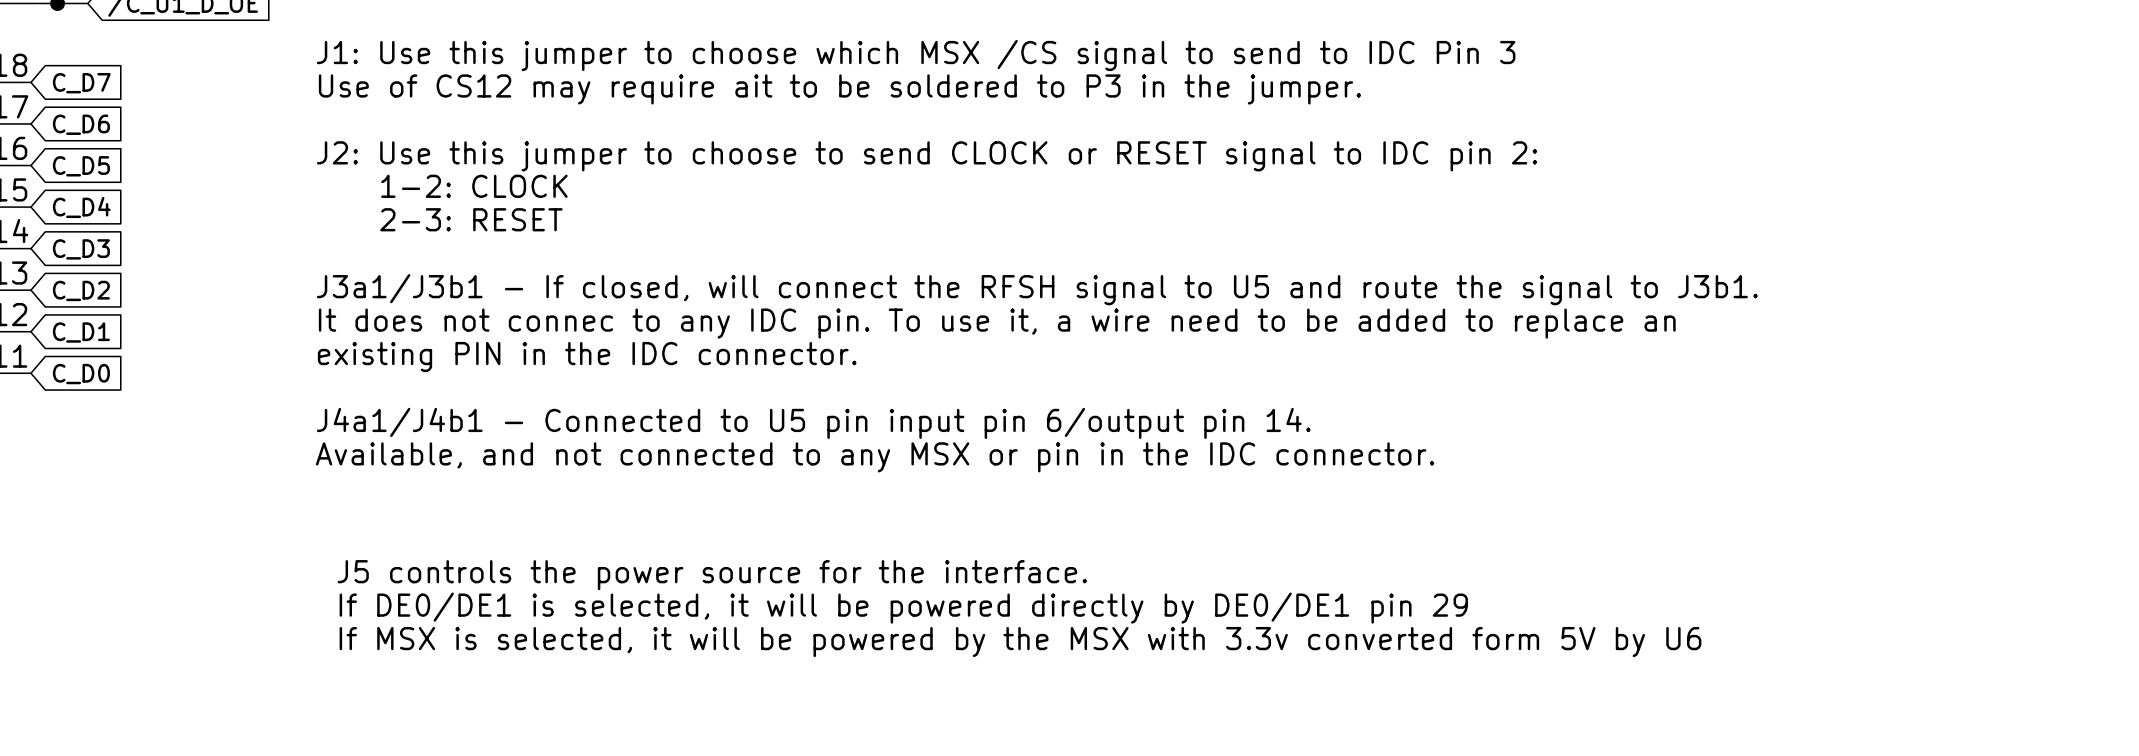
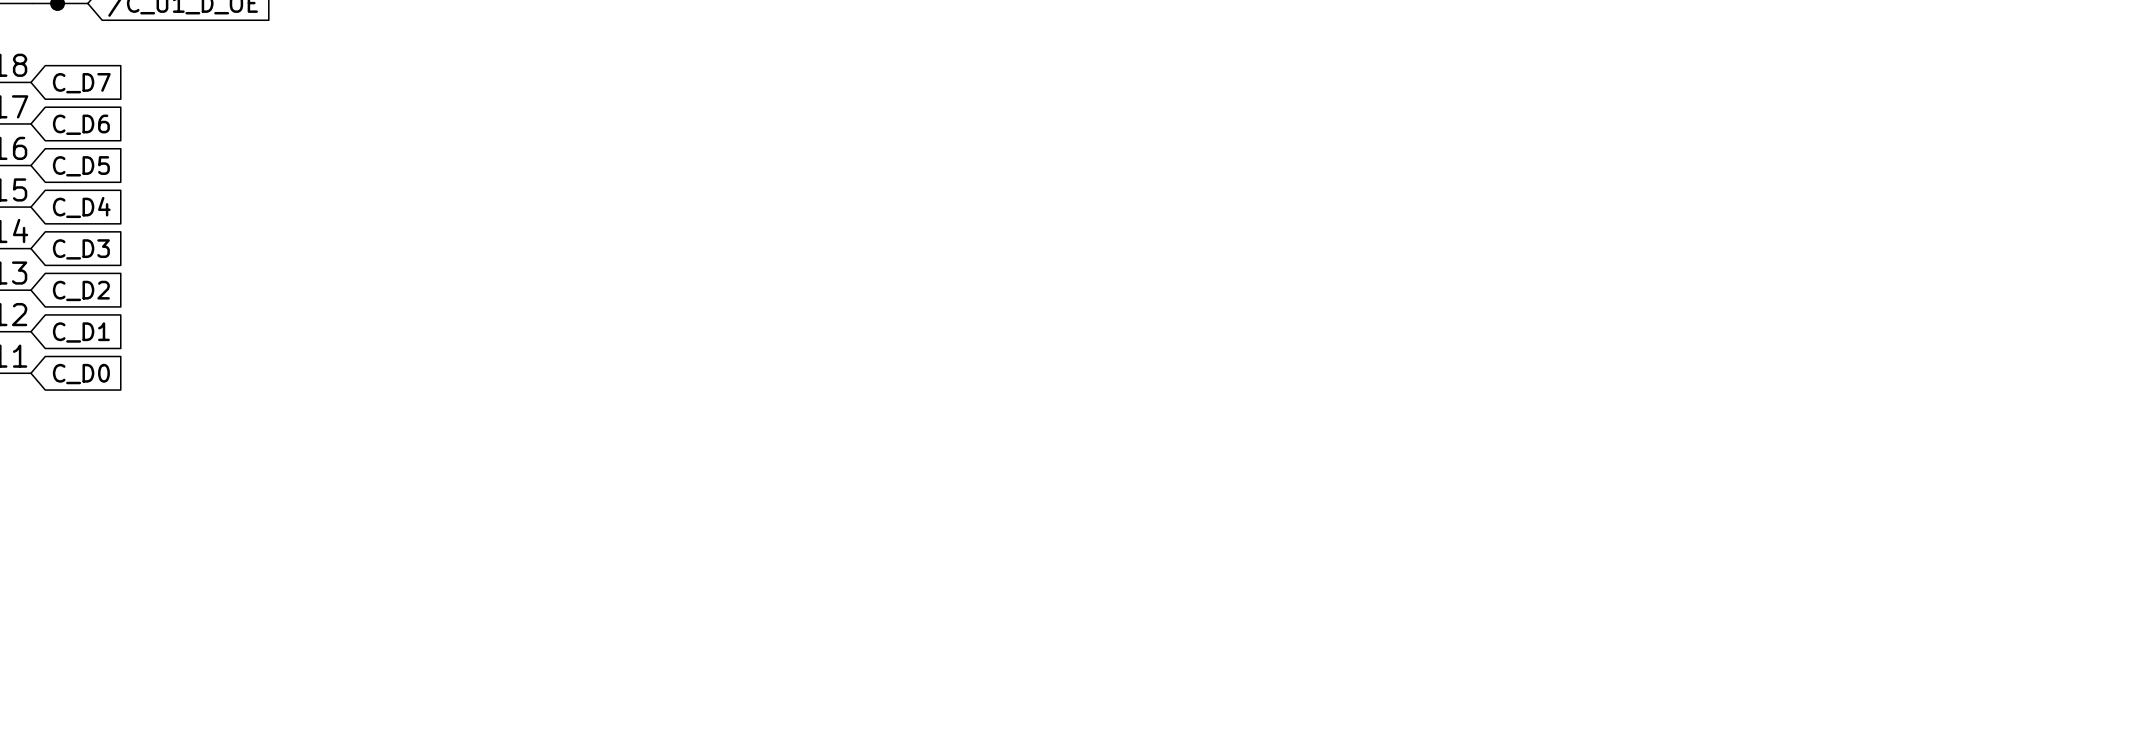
text: J1: Use this jumper to choose which MSX /CS signal to send to IDC Pin 3 (916, 55) -> none
text: Use of CS12 may require ait to be soldered to P3 in the jumper. (839, 89) -> none
text: J2: Use this jumper to choose to send CLOCK or RESET signal to IDC pin 2: (927, 156) -> none
text: 1-2: CLOCK (474, 186) -> none
text: 2-3: RESET (471, 219) -> none
text: J3a1/J3b1 - If closed, will connect the RFSH signal to U5 and route the signal to J3b1. (1037, 289) -> none
text: It does not connec to any IDC pin. To use it, a wire need to be added to replace an (997, 323) -> none
text: existing PIN in the IDC connector. (587, 357) -> none
text: J4a1/J4b1 - Connected to U5 pin input pin 6/output pin 14. (813, 423) -> none
text: Available, and not connected to any MSX or pin in the IDC connector. (875, 457) -> none
text: J5 controls the power source for the interface. (712, 575) -> none
text: If DE0/DE1 is selected, it will be powered directly by DE0/DE1 pin 29 (903, 608) -> none
text: If MSX is selected, it will be powered by the MSX with 3.3v converted form 5V by U6 (1020, 642) -> none

